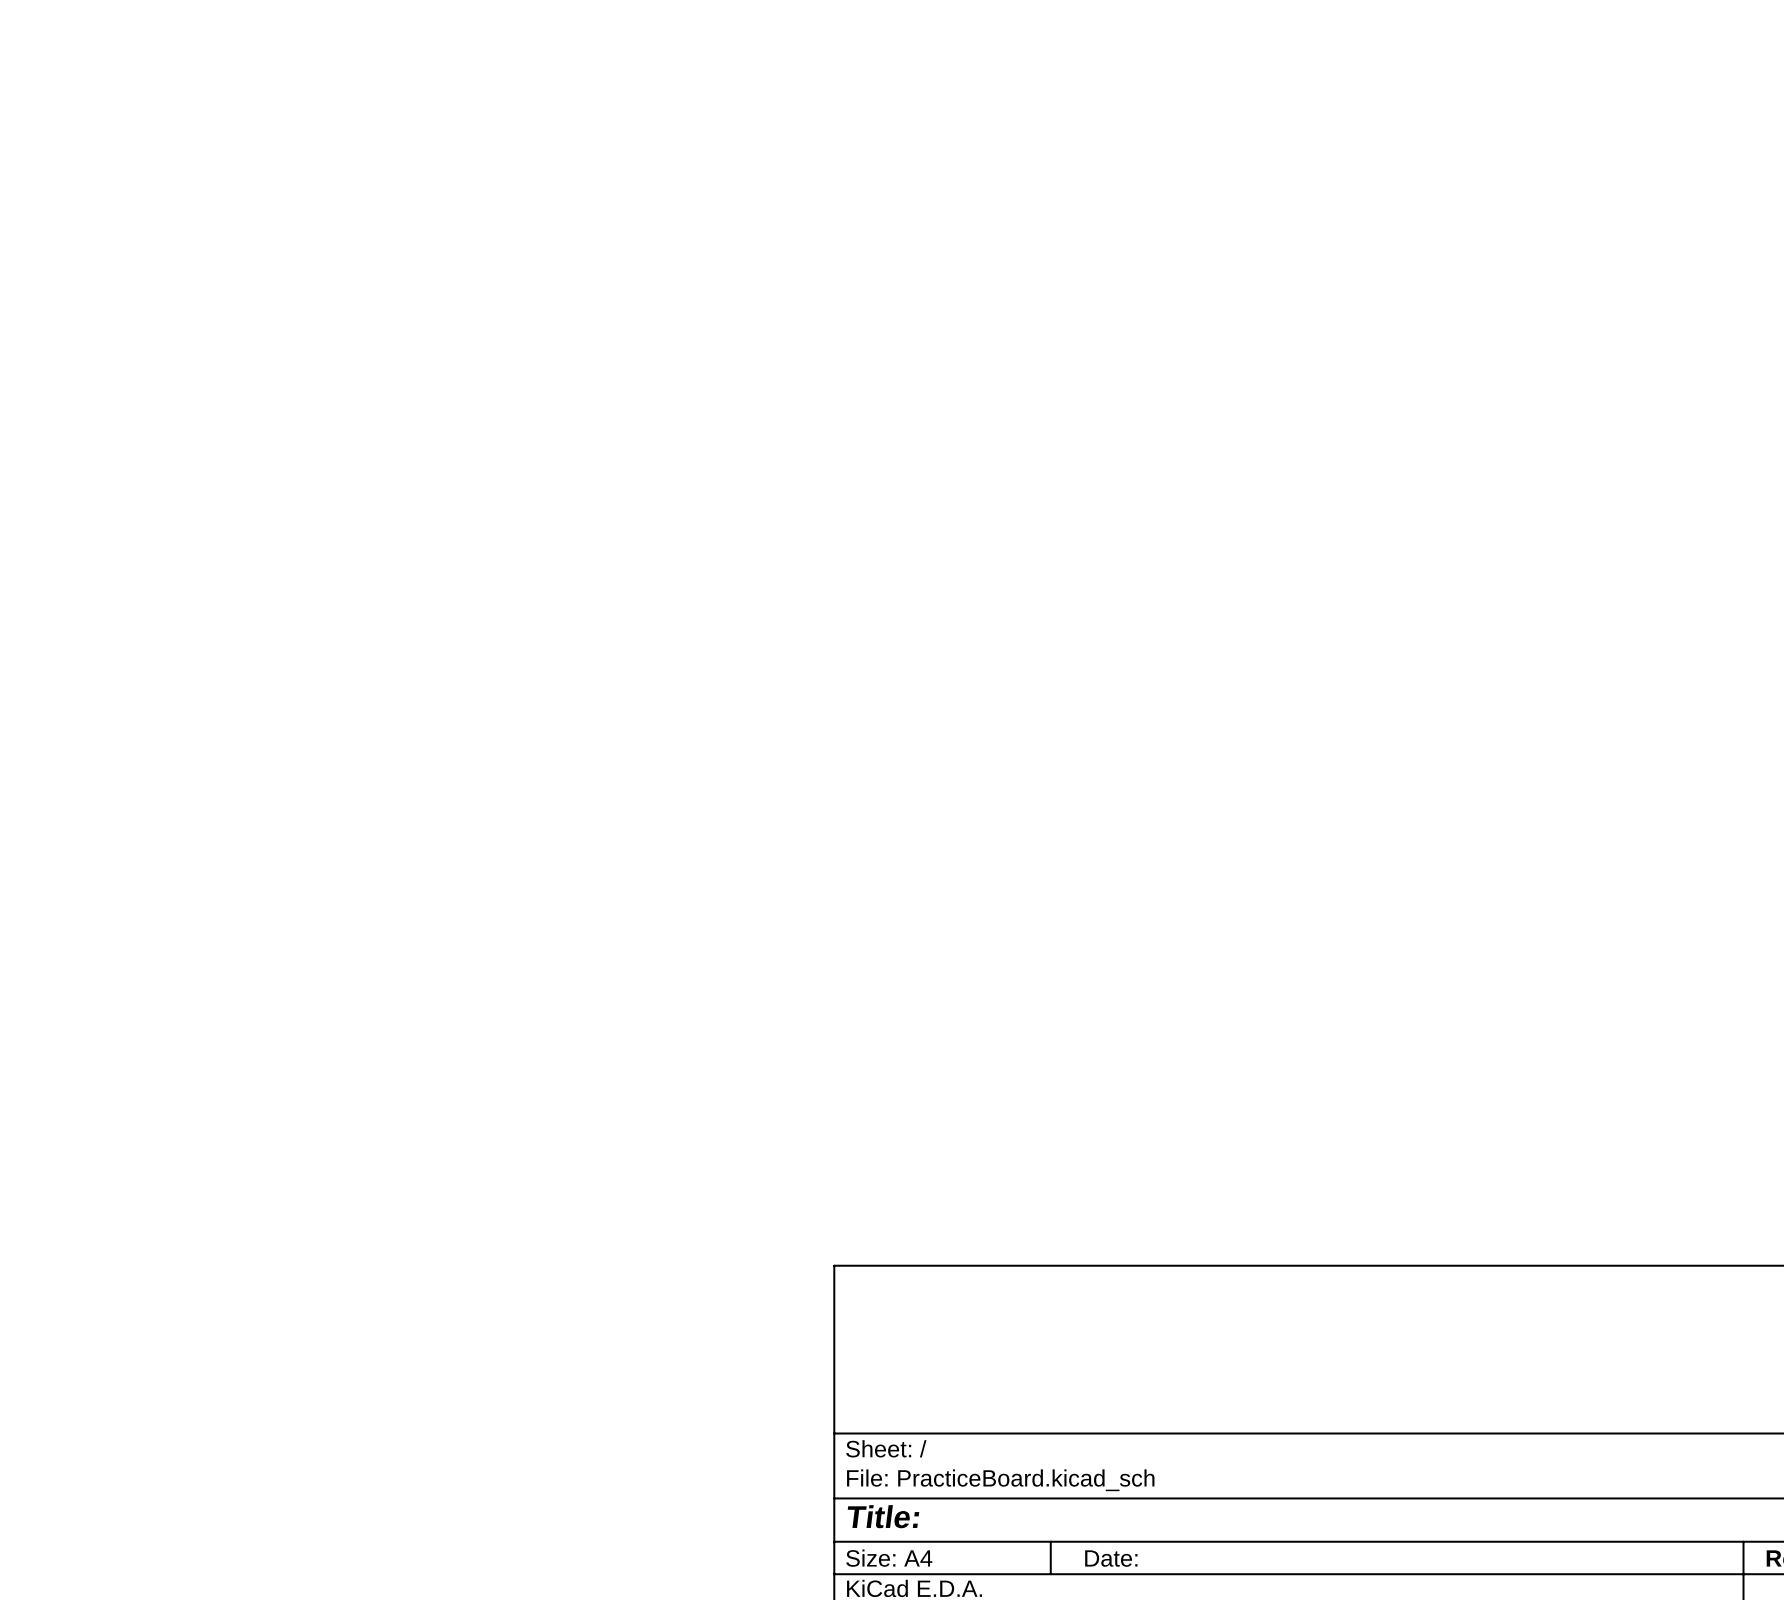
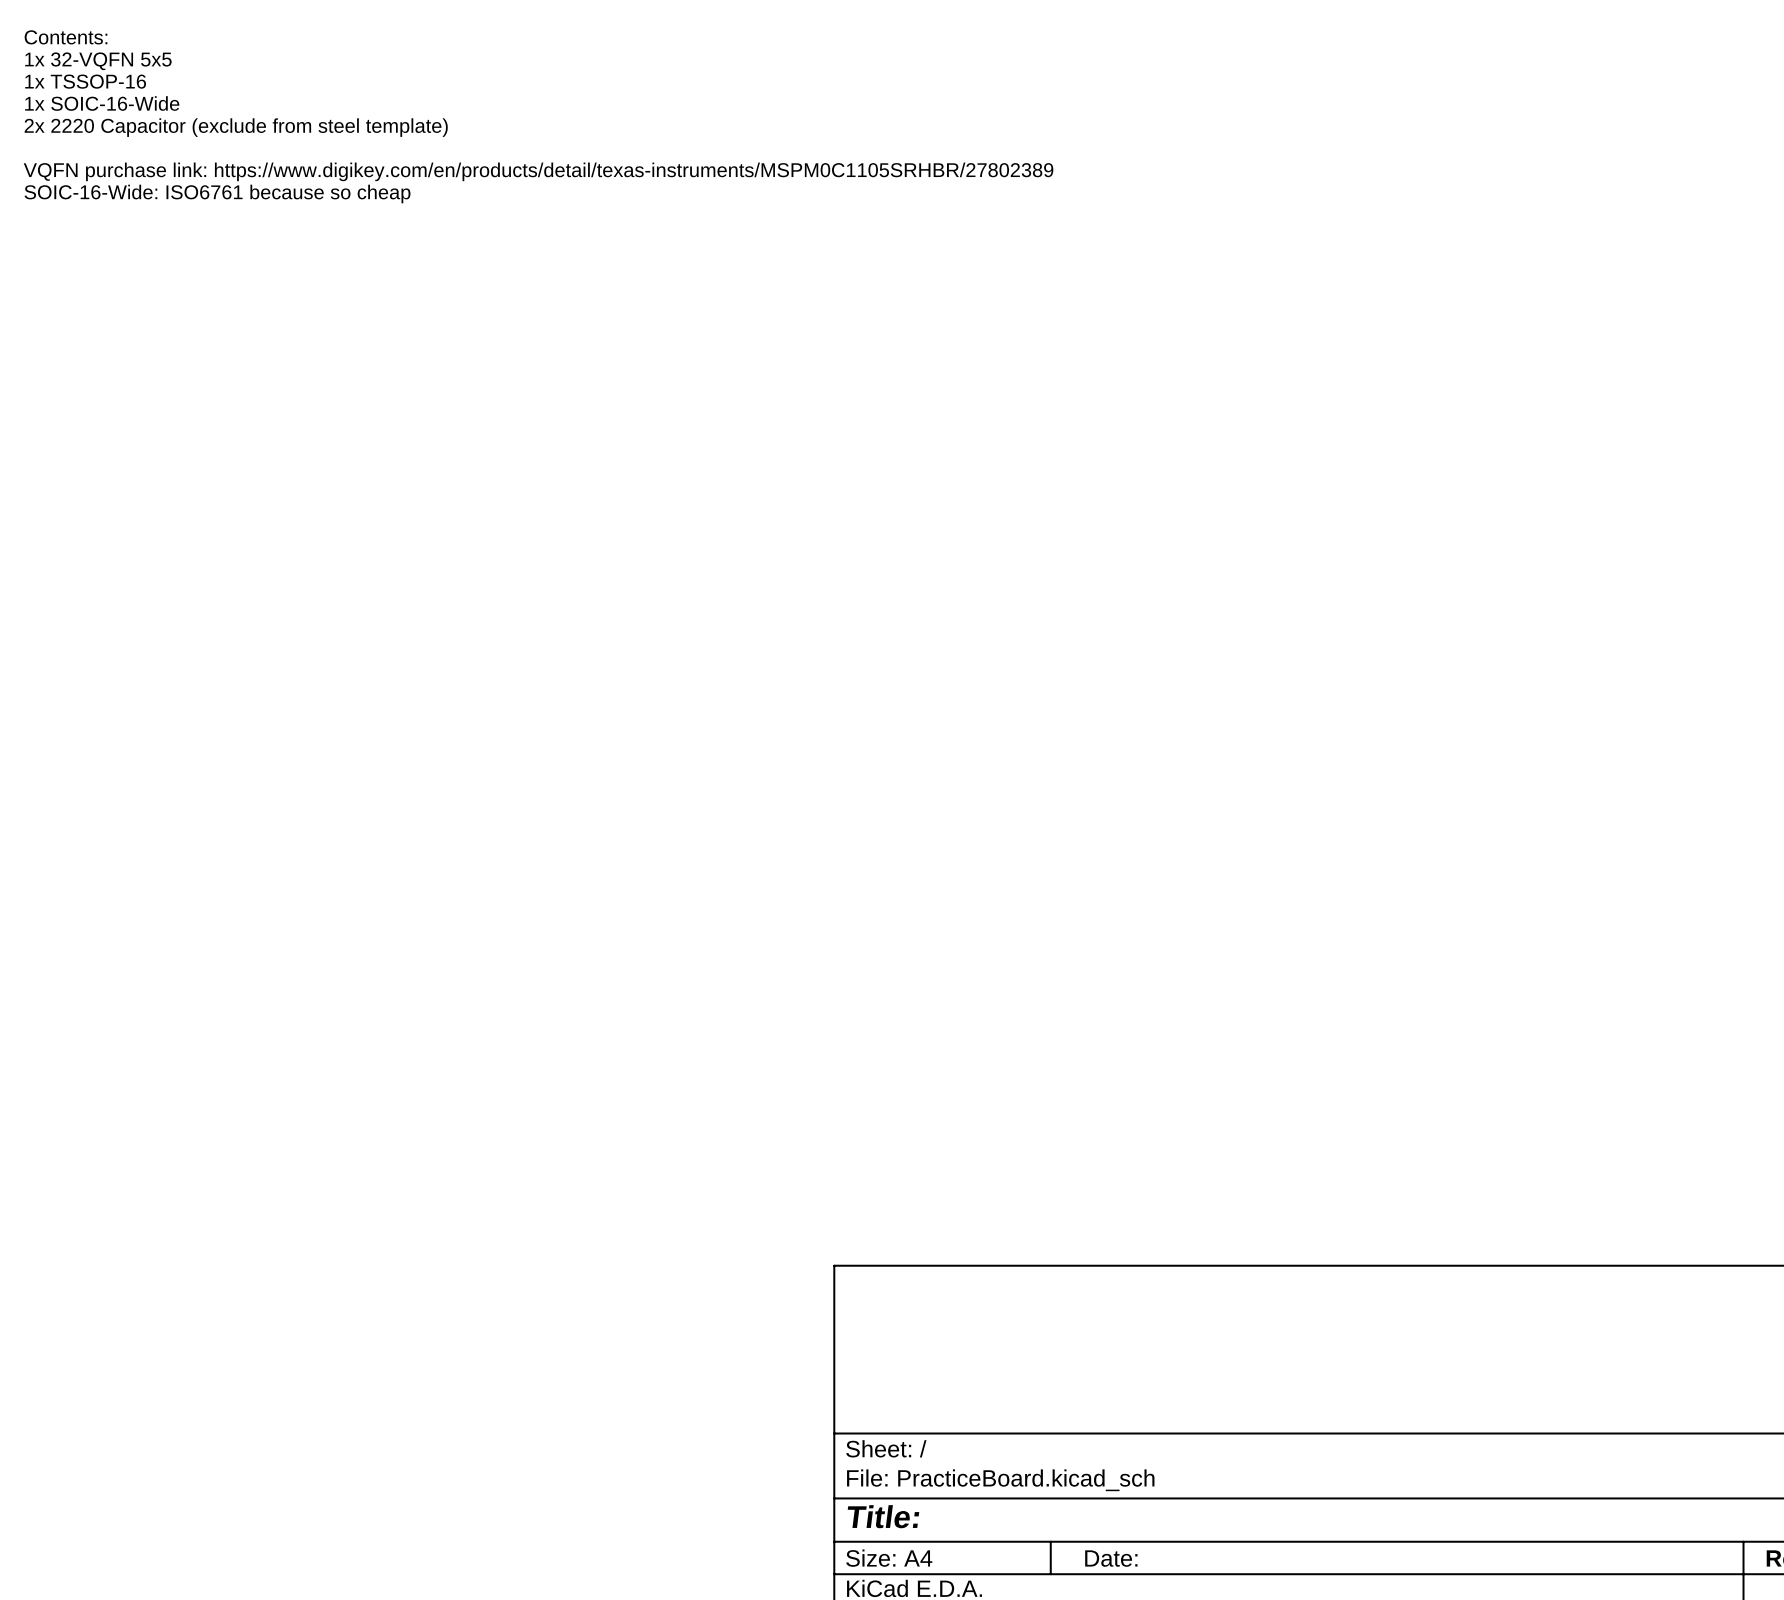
text: none -> Contents: (66, 37)
text: none -> 1x 32-VQFN 5x5 (98, 61)
text: none -> 1x TSSOP-16 (85, 81)
text: none -> 1x SOIC-16-Wide (102, 103)
text: none -> 2x 2220 Capacitor (exclude from steel template) (236, 127)
text: none -> VQFN purchase link: https://www.digikey.com/en/products/detail/texas-instruments/MSPM0C1105SRHBR/27802389 (538, 171)
text: none -> SOIC-16-Wide: ISO6761 because so cheap (217, 194)

